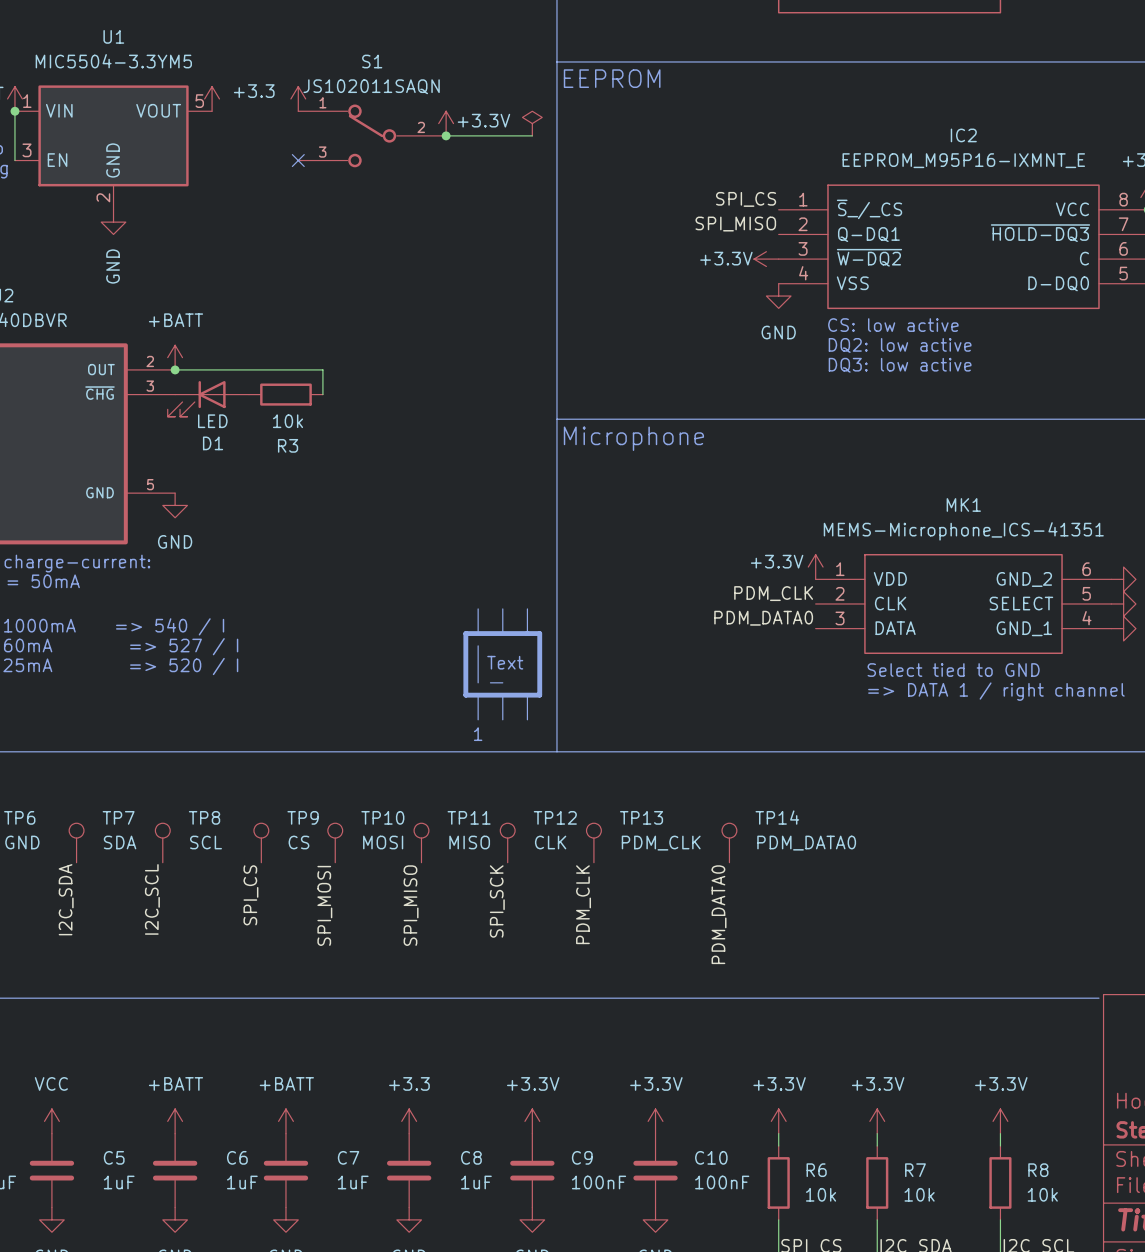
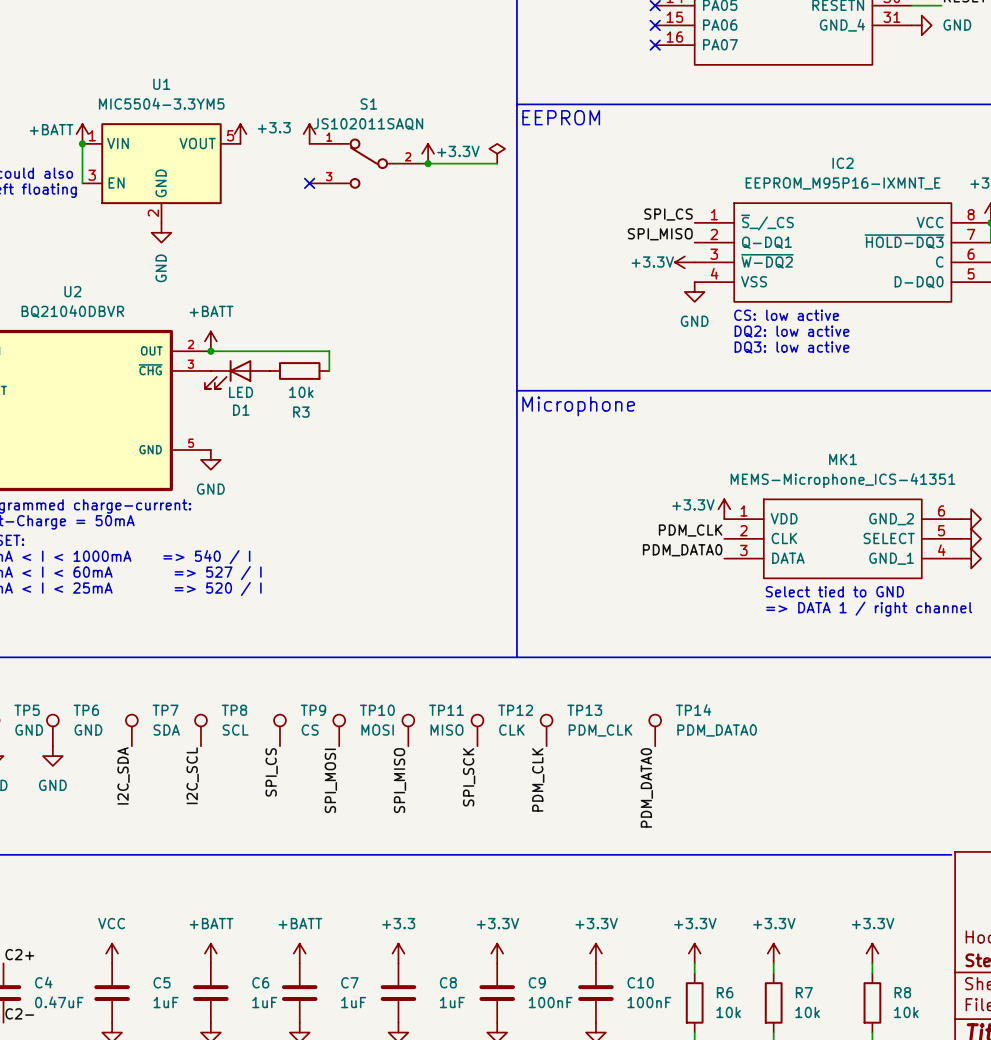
line: (478, 608) (478, 633) -> none
line: (502, 608) (502, 633) -> none
line: (527, 608) (527, 633) -> none
line: (465, 633) (539, 633) (539, 695) (465, 695) (465, 633) -> none
line: (478, 645) (478, 682) -> none
text: Text (505, 662) -> none
line: (490, 682) (502, 682) -> none
line: (478, 695) (478, 719) -> none
line: (502, 695) (502, 719) -> none
line: (527, 695) (527, 719) -> none
text: 1 (478, 734) -> none

